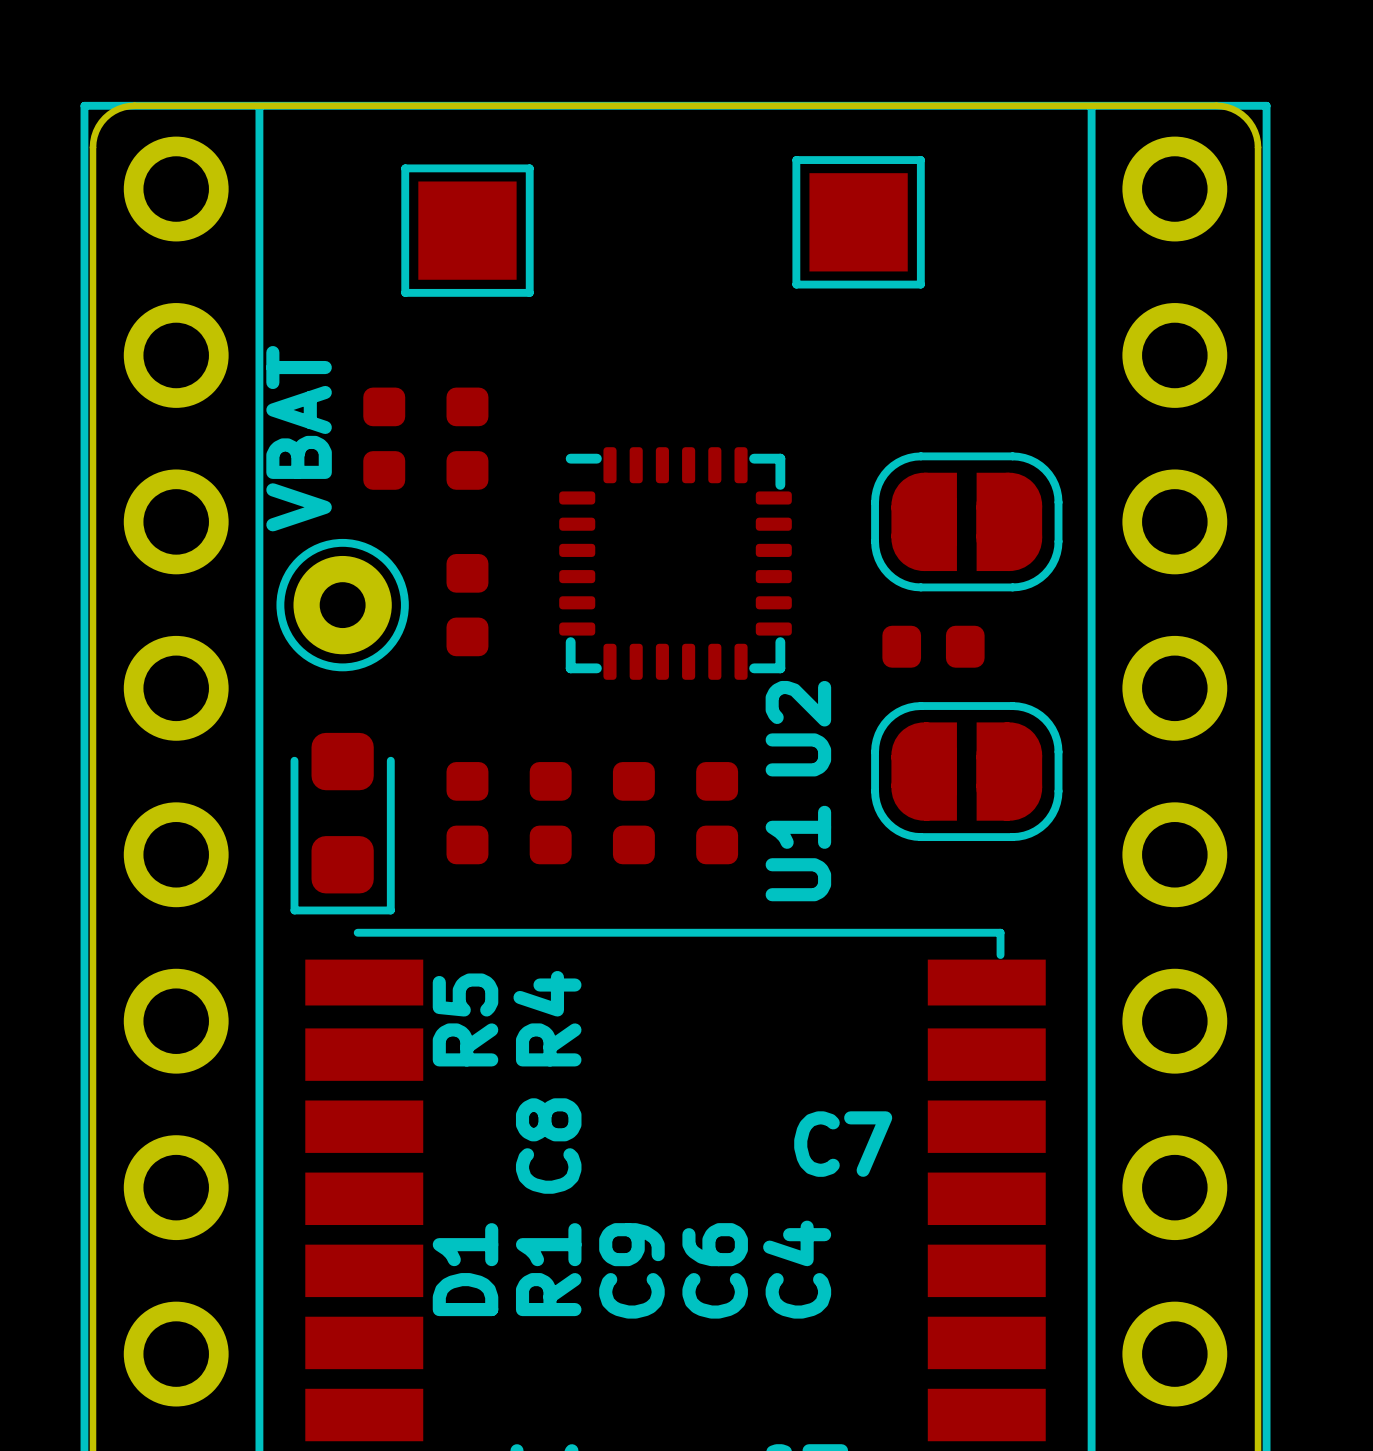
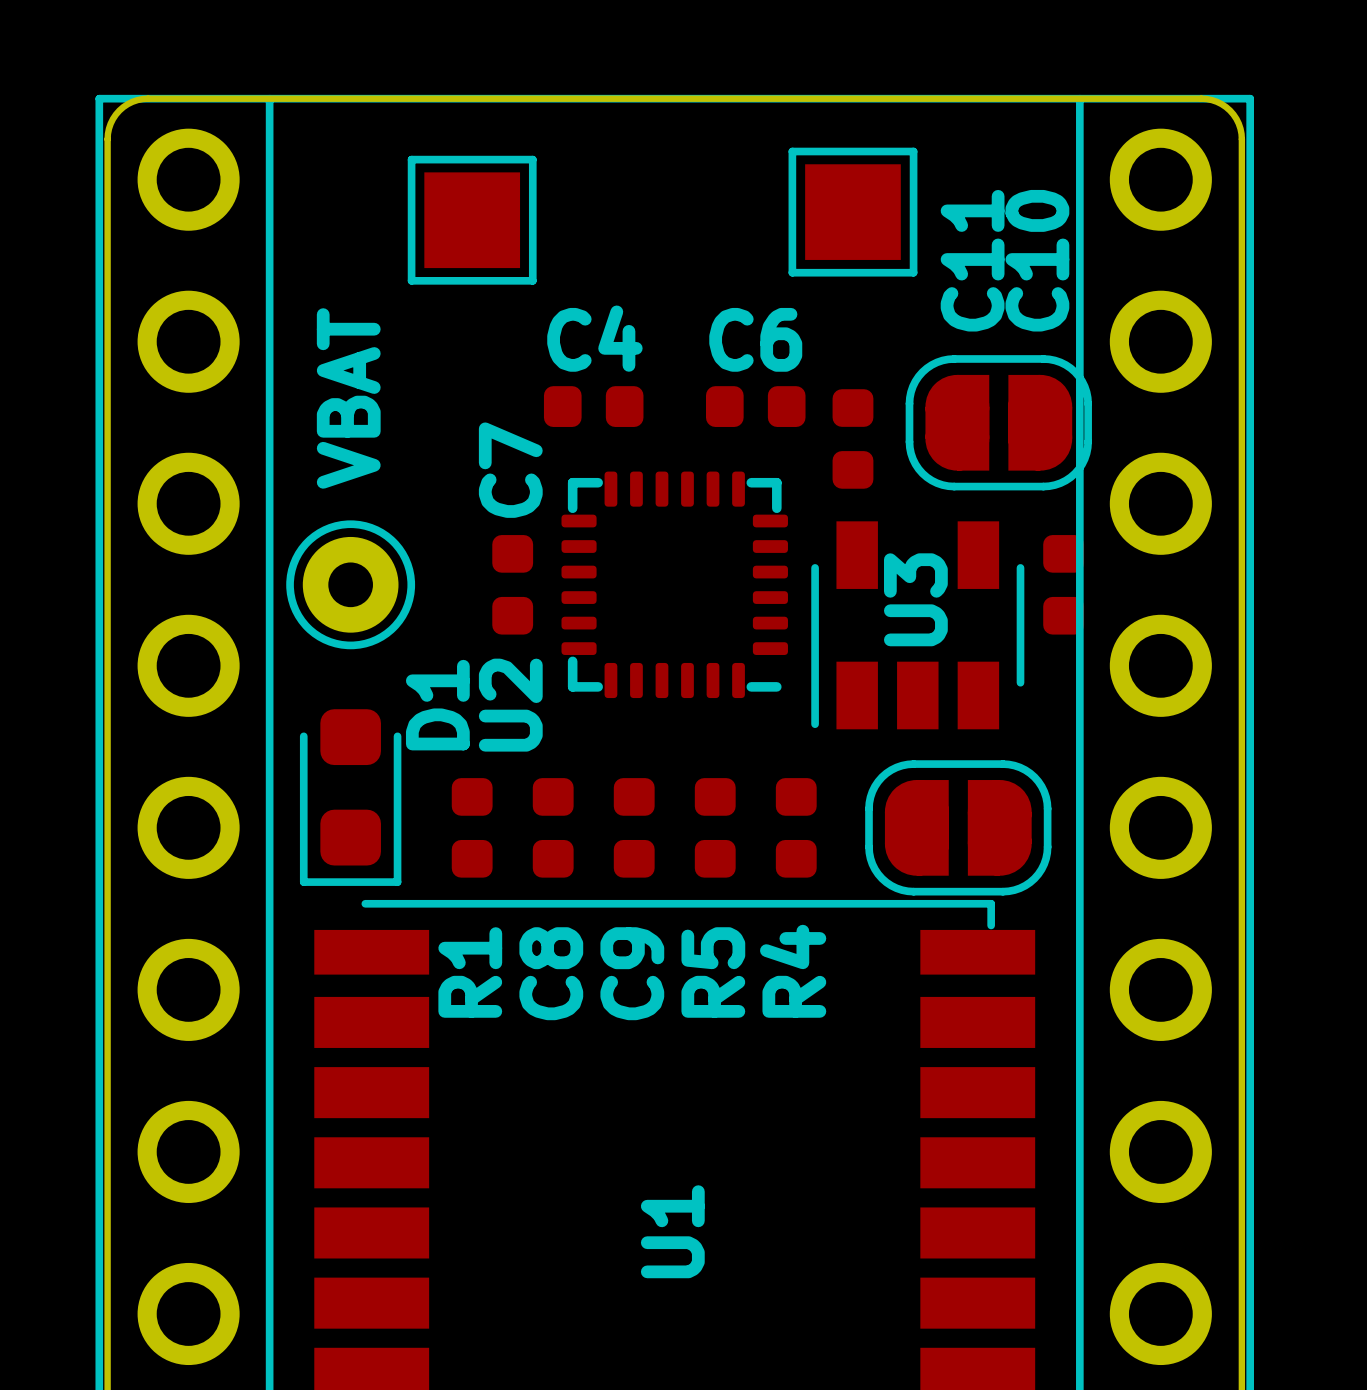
part value position: VBAT (299, 438) -> VBAT (348, 398)
R5 position: (384, 438) -> (715, 827)
R4 position: (467, 438) -> (796, 827)
C11: none -> (852, 438)
part position: (966, 521) -> (998, 422)
U2 rotation: 0° (675, 563) -> 180° (674, 584)
C8 position: (467, 605) -> (553, 827)
C10: none -> (1063, 584)
U3: none -> (917, 625)
C7 rotation: 0° (933, 646) -> 90° clockwise (512, 584)
C7 position: (933, 646) -> (512, 584)
U2 name position: U2 (798, 728) -> U2 (510, 705)
part position: (966, 771) -> (958, 827)
R1 position: (467, 813) -> (472, 827)
C9 position: (550, 813) -> (634, 827)
C6 rotation: 0° (633, 813) -> 90° clockwise (755, 406)
C6 position: (633, 813) -> (755, 406)
C4 rotation: 0° (717, 813) -> 90° clockwise (593, 406)
C4 position: (717, 813) -> (593, 406)
U1 name position: U1 (798, 853) -> U1 (672, 1231)
R4 name position: R4 (547, 1018) -> R4 (793, 971)
R5 name position: R5 (465, 1019) -> R5 (713, 972)
C7 name position: C7 (843, 1144) -> C7 (510, 470)
C8 name position: C8 (548, 1146) -> C8 (551, 973)
D1 name position: D1 (465, 1269) -> D1 (437, 705)
R1 name position: R1 (548, 1269) -> R1 (470, 972)
C4 name position: C4 (797, 1269) -> C4 (594, 338)
C9 name position: C9 (631, 1270) -> C9 (632, 973)
C6 name position: C6 (715, 1270) -> C6 (755, 339)

